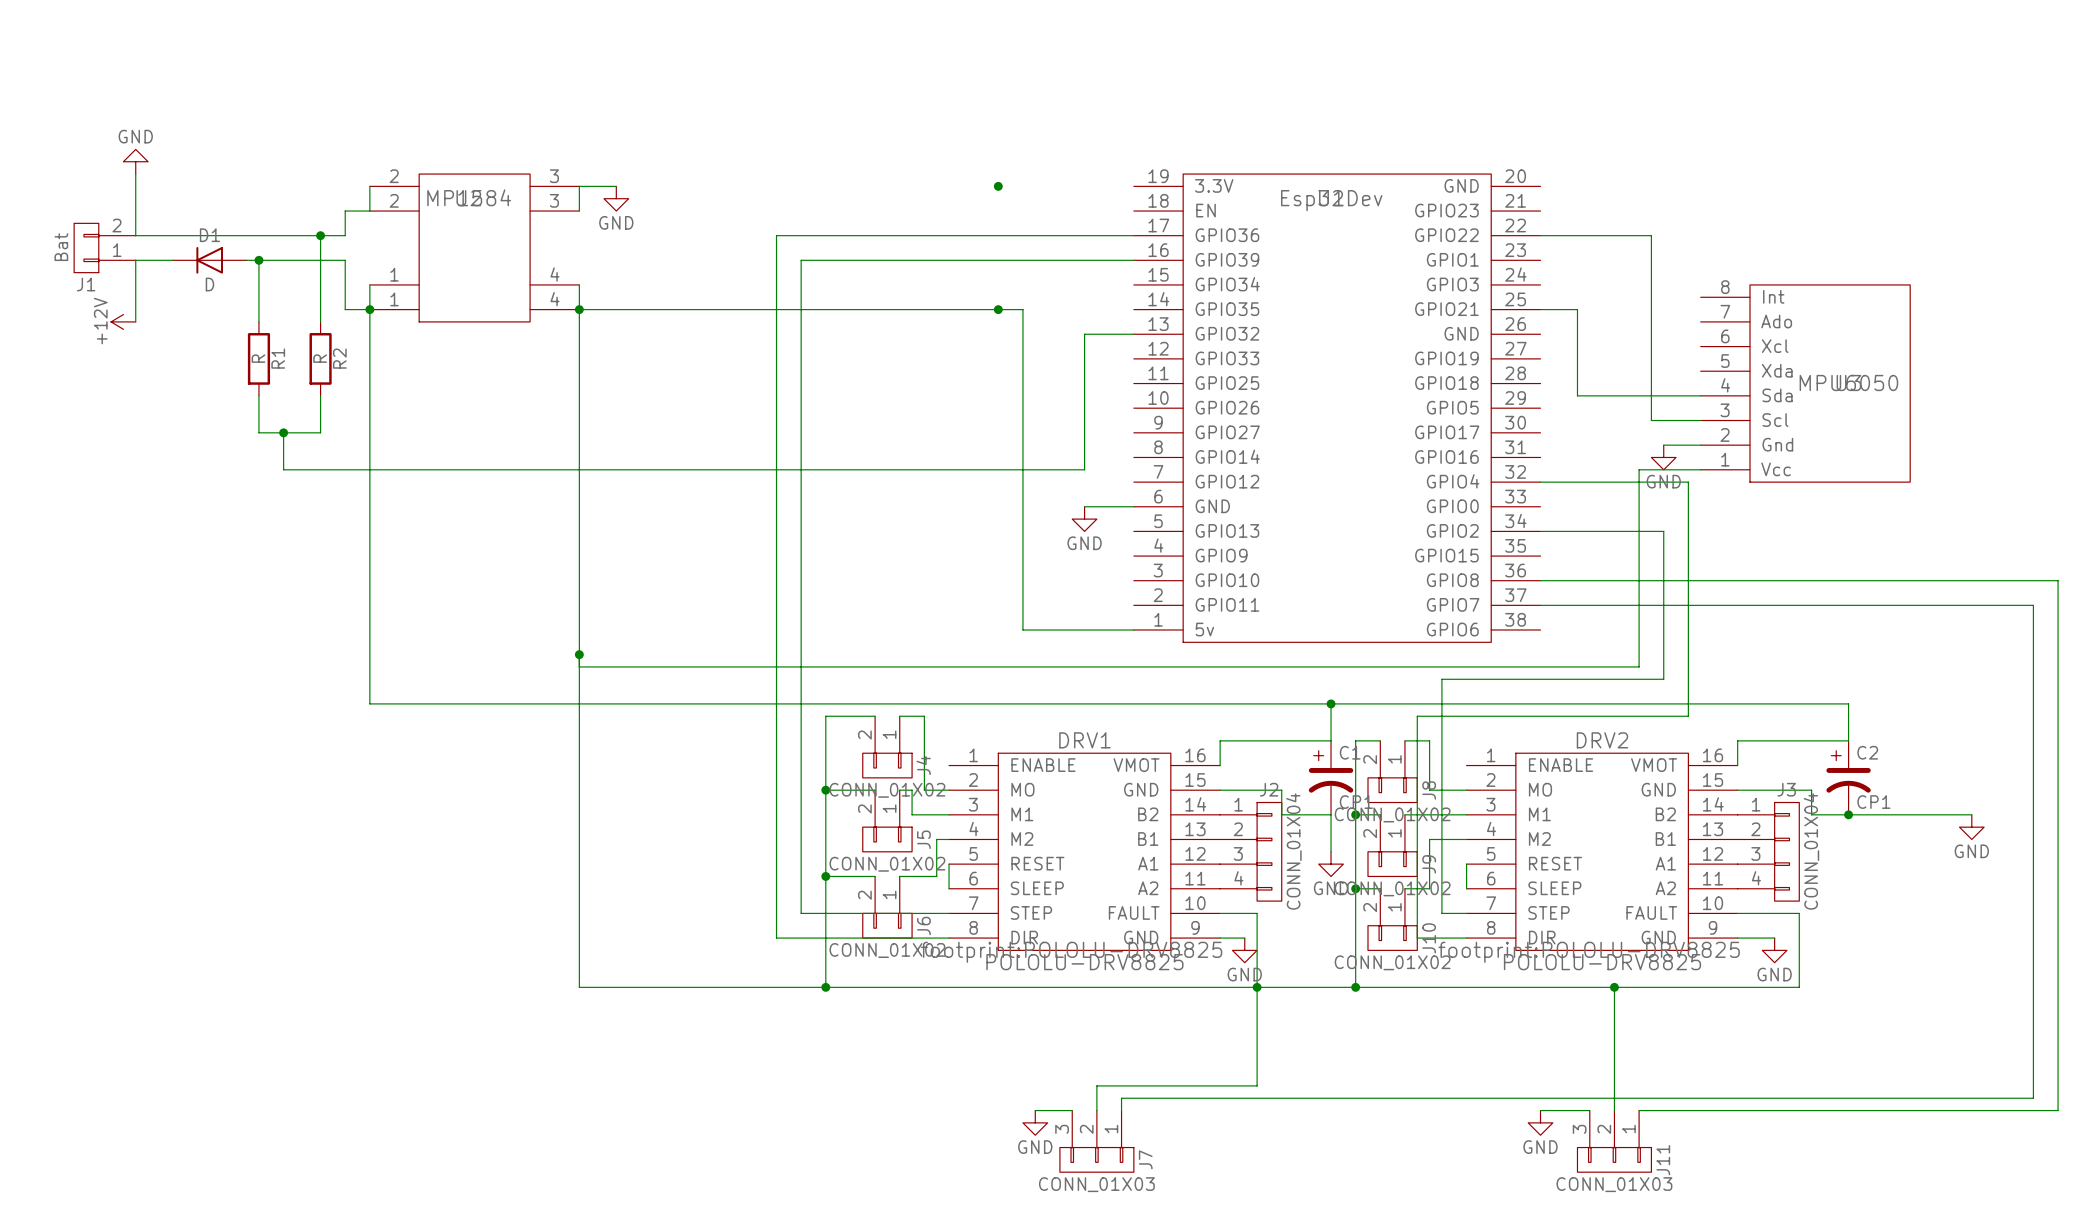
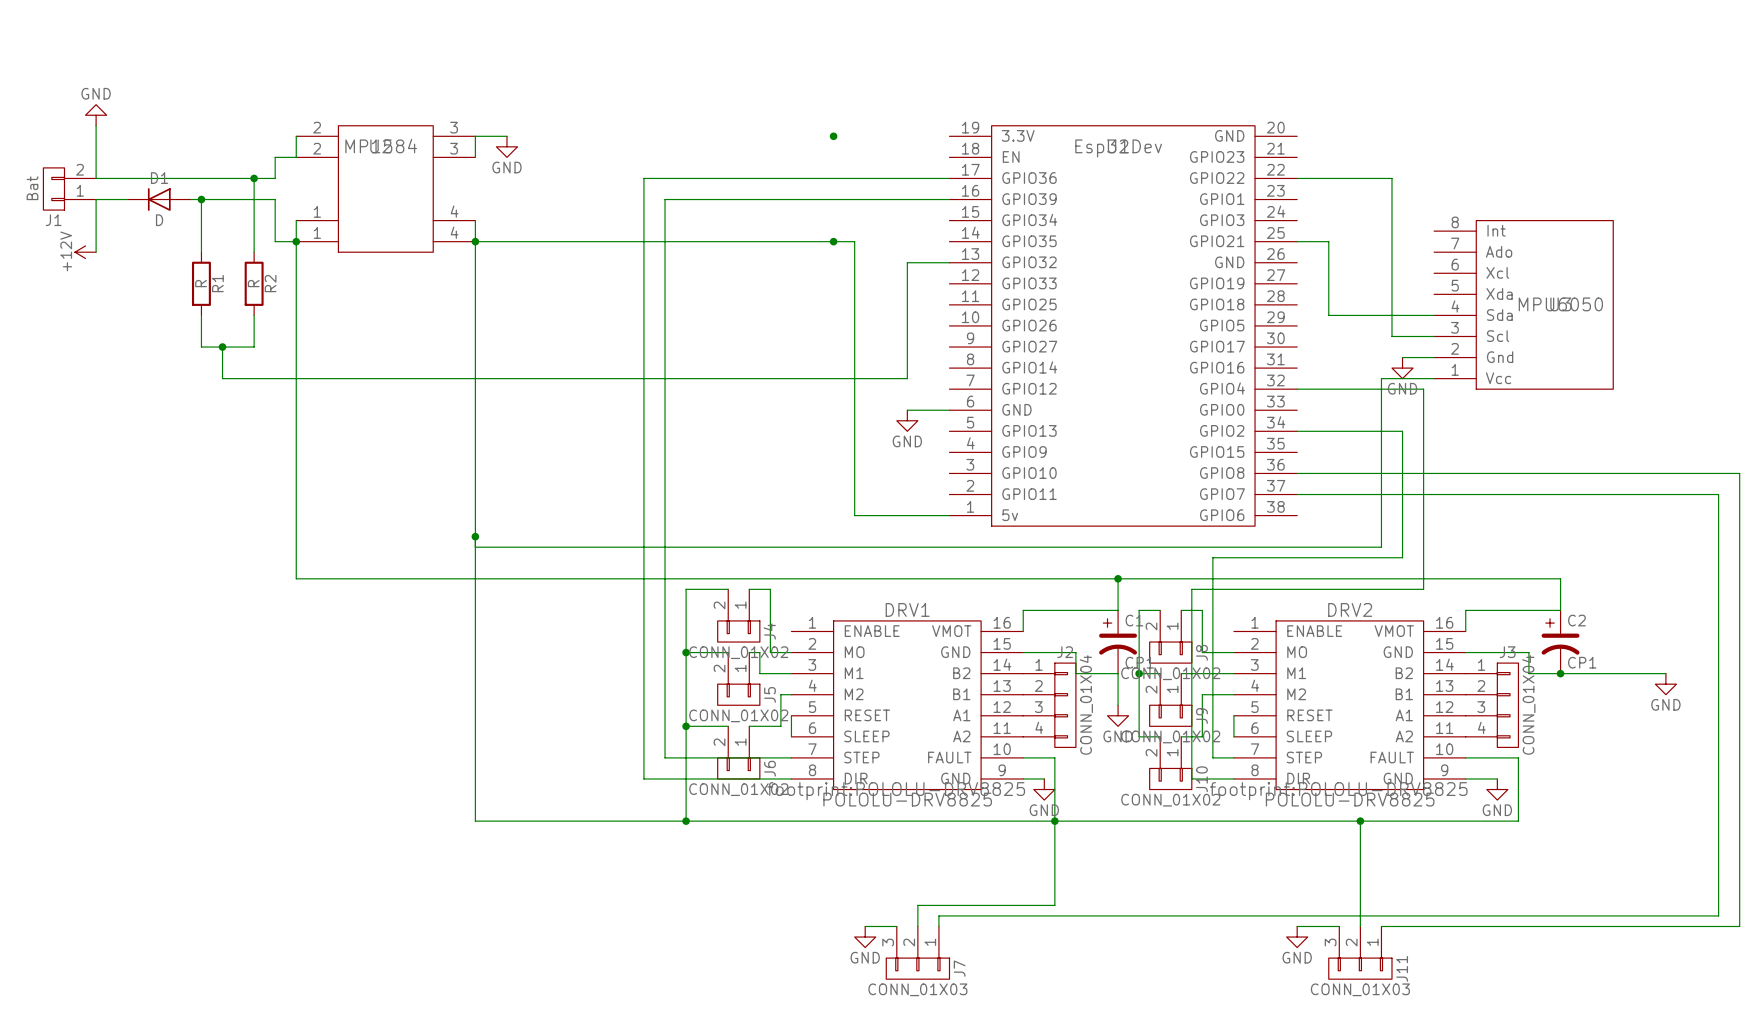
wire: (1355, 888) (1355, 987) -> none
junction: (1355, 888) -> none
junction: (1355, 987) -> none

